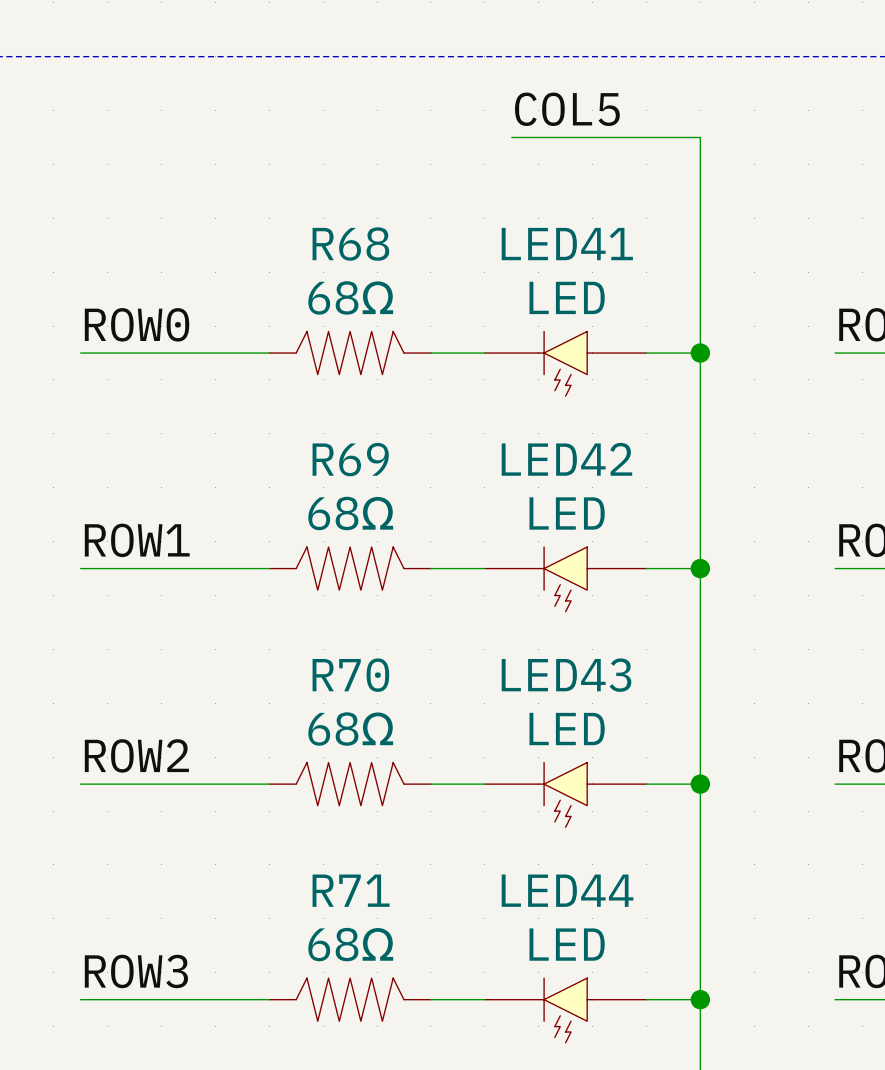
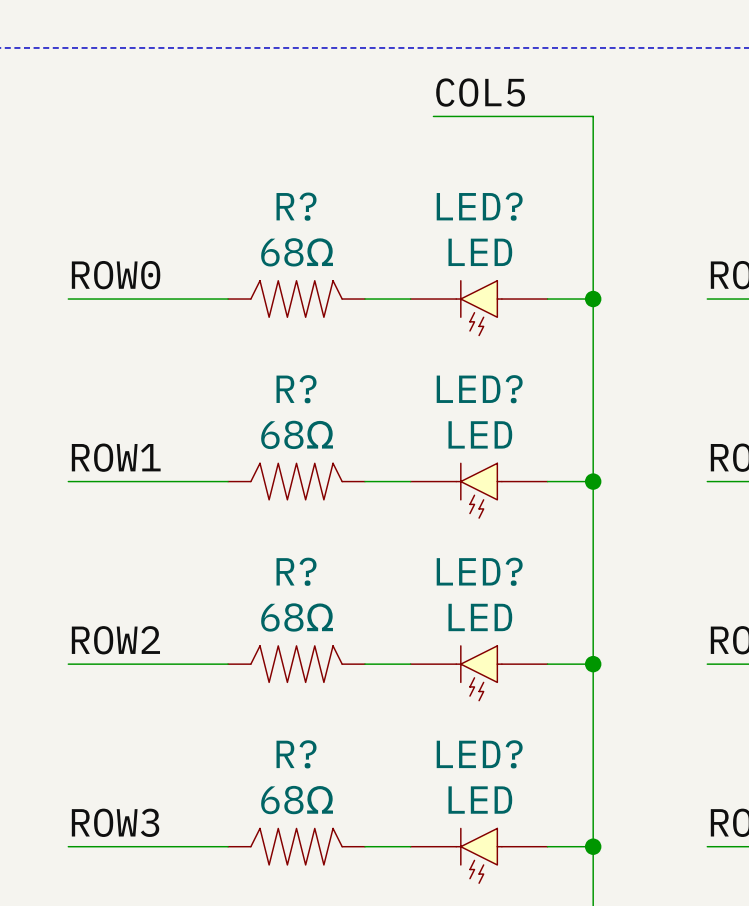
R68 name: R68 (350, 244) -> R? (296, 206)
LED41 name: LED41 (567, 244) -> LED? (479, 206)
R69 name: R69 (350, 459) -> R? (296, 389)
LED42 name: LED42 (566, 459) -> LED? (479, 389)
R70 name: R70 (350, 675) -> R? (296, 571)
LED43 name: LED43 (566, 675) -> LED? (479, 571)
R71 name: R71 (351, 890) -> R? (296, 754)
LED44 name: LED44 (567, 890) -> LED? (479, 754)

